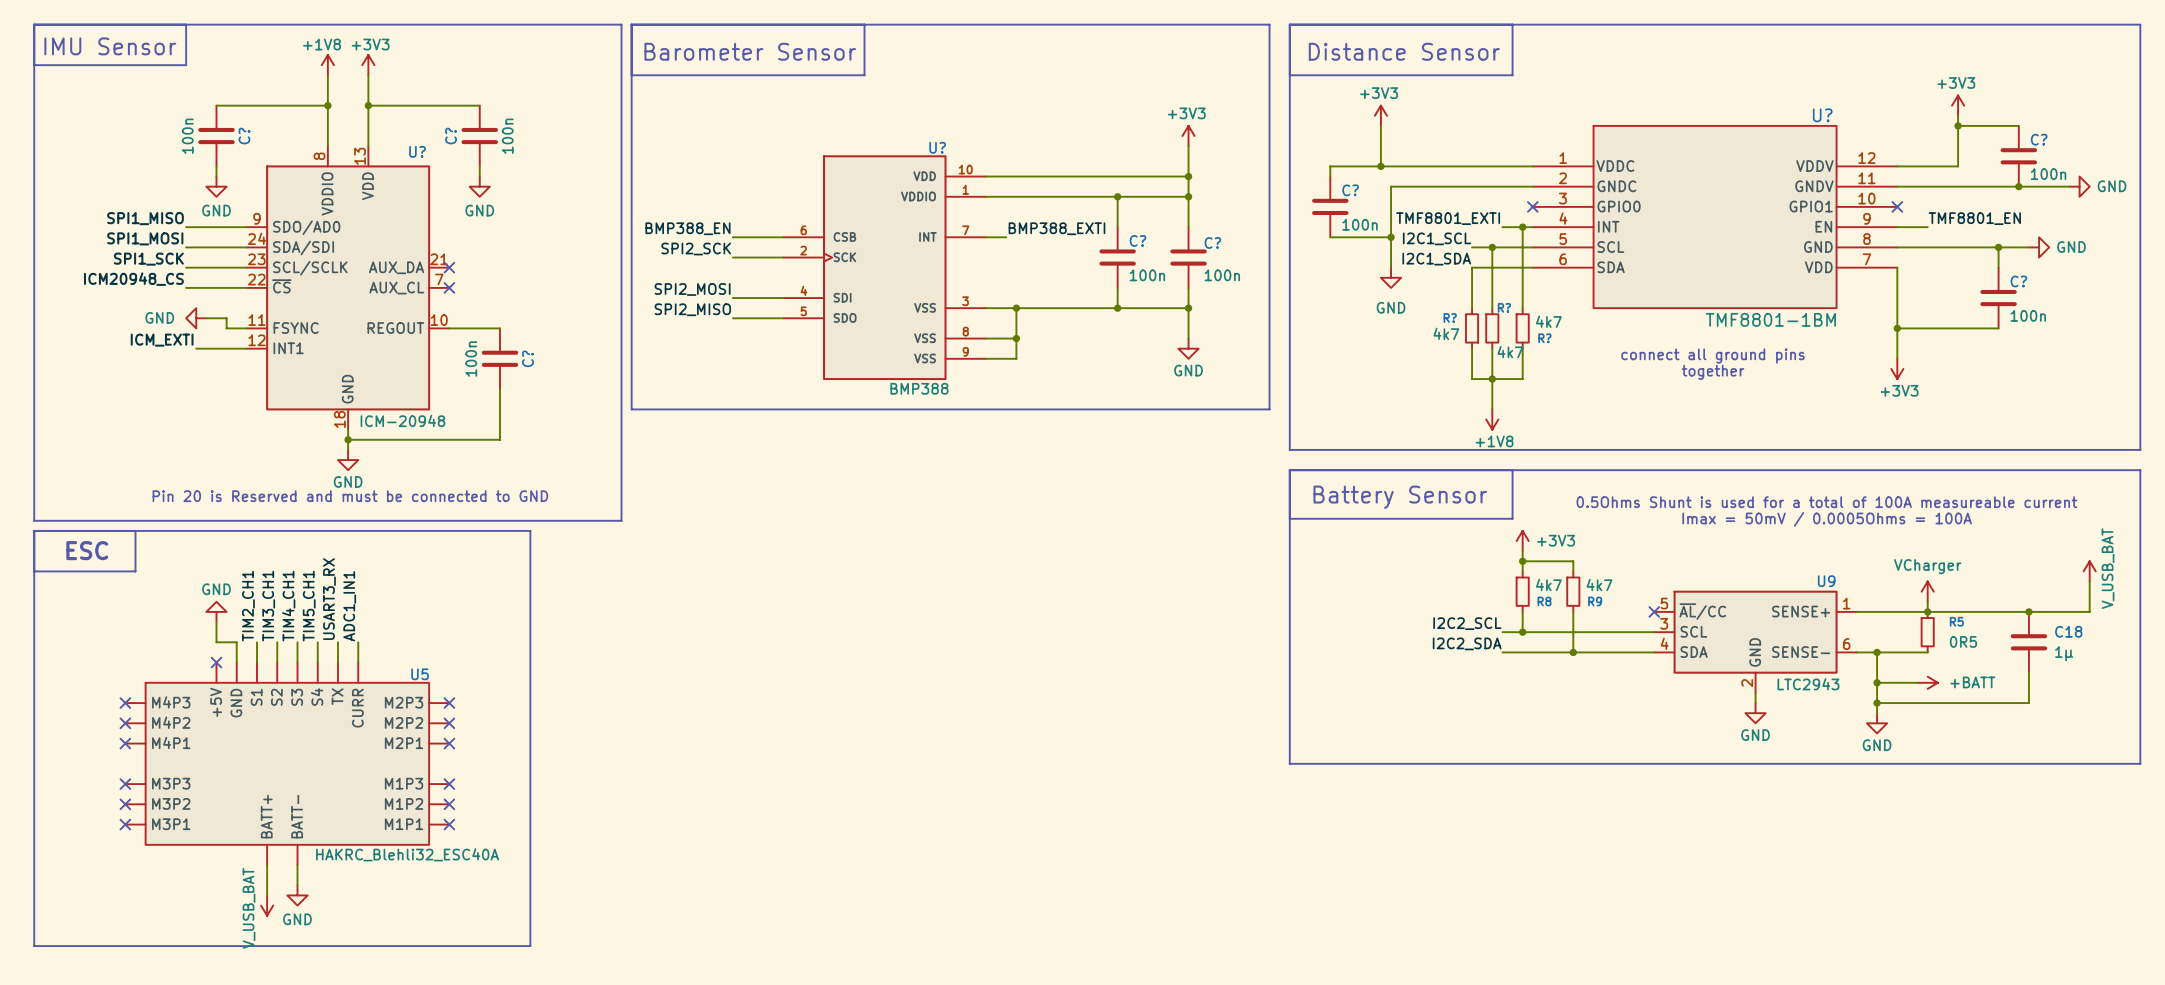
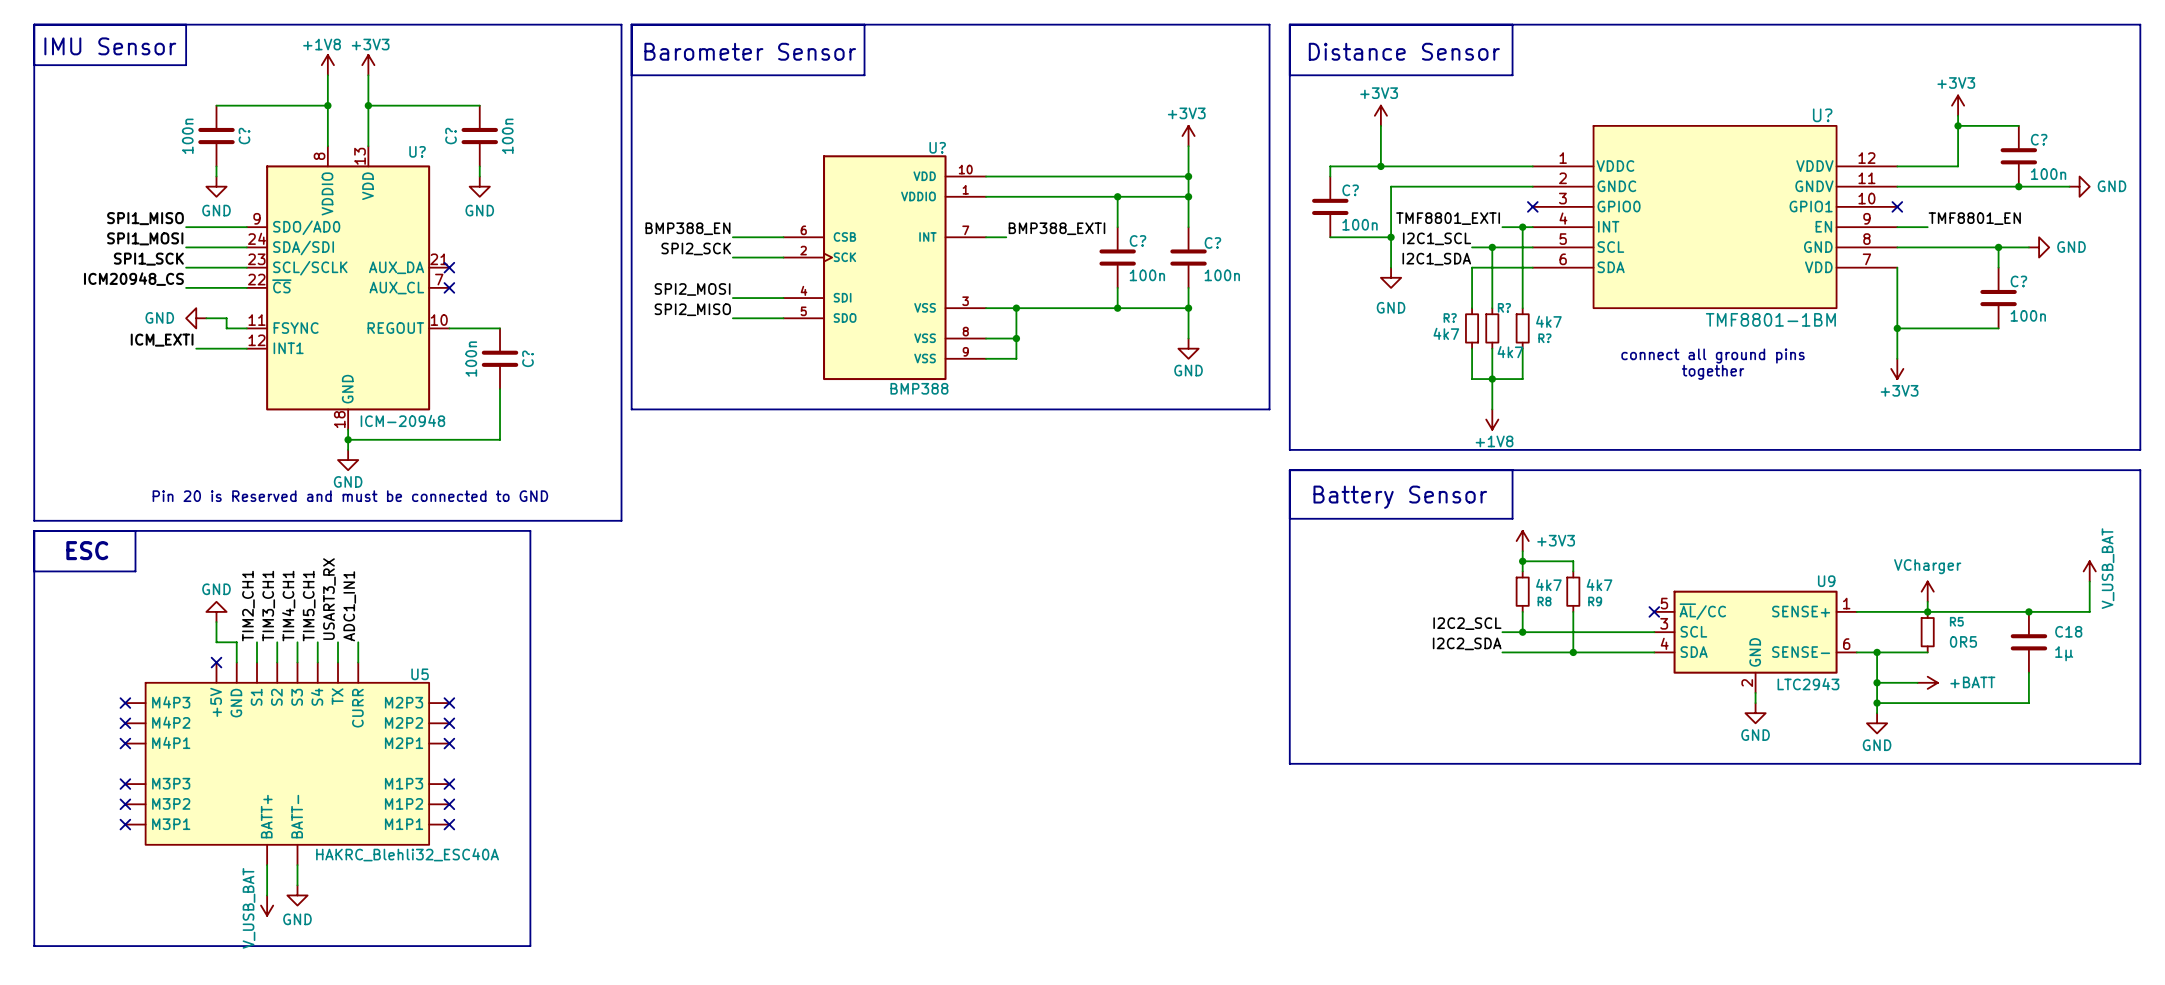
text: 0.5Ohms Shunt is used for a total of 100A measureable current (1826, 502) -> none
text: Imax = 50mV / 0.0005Ohms = 100A (1827, 519) -> none

